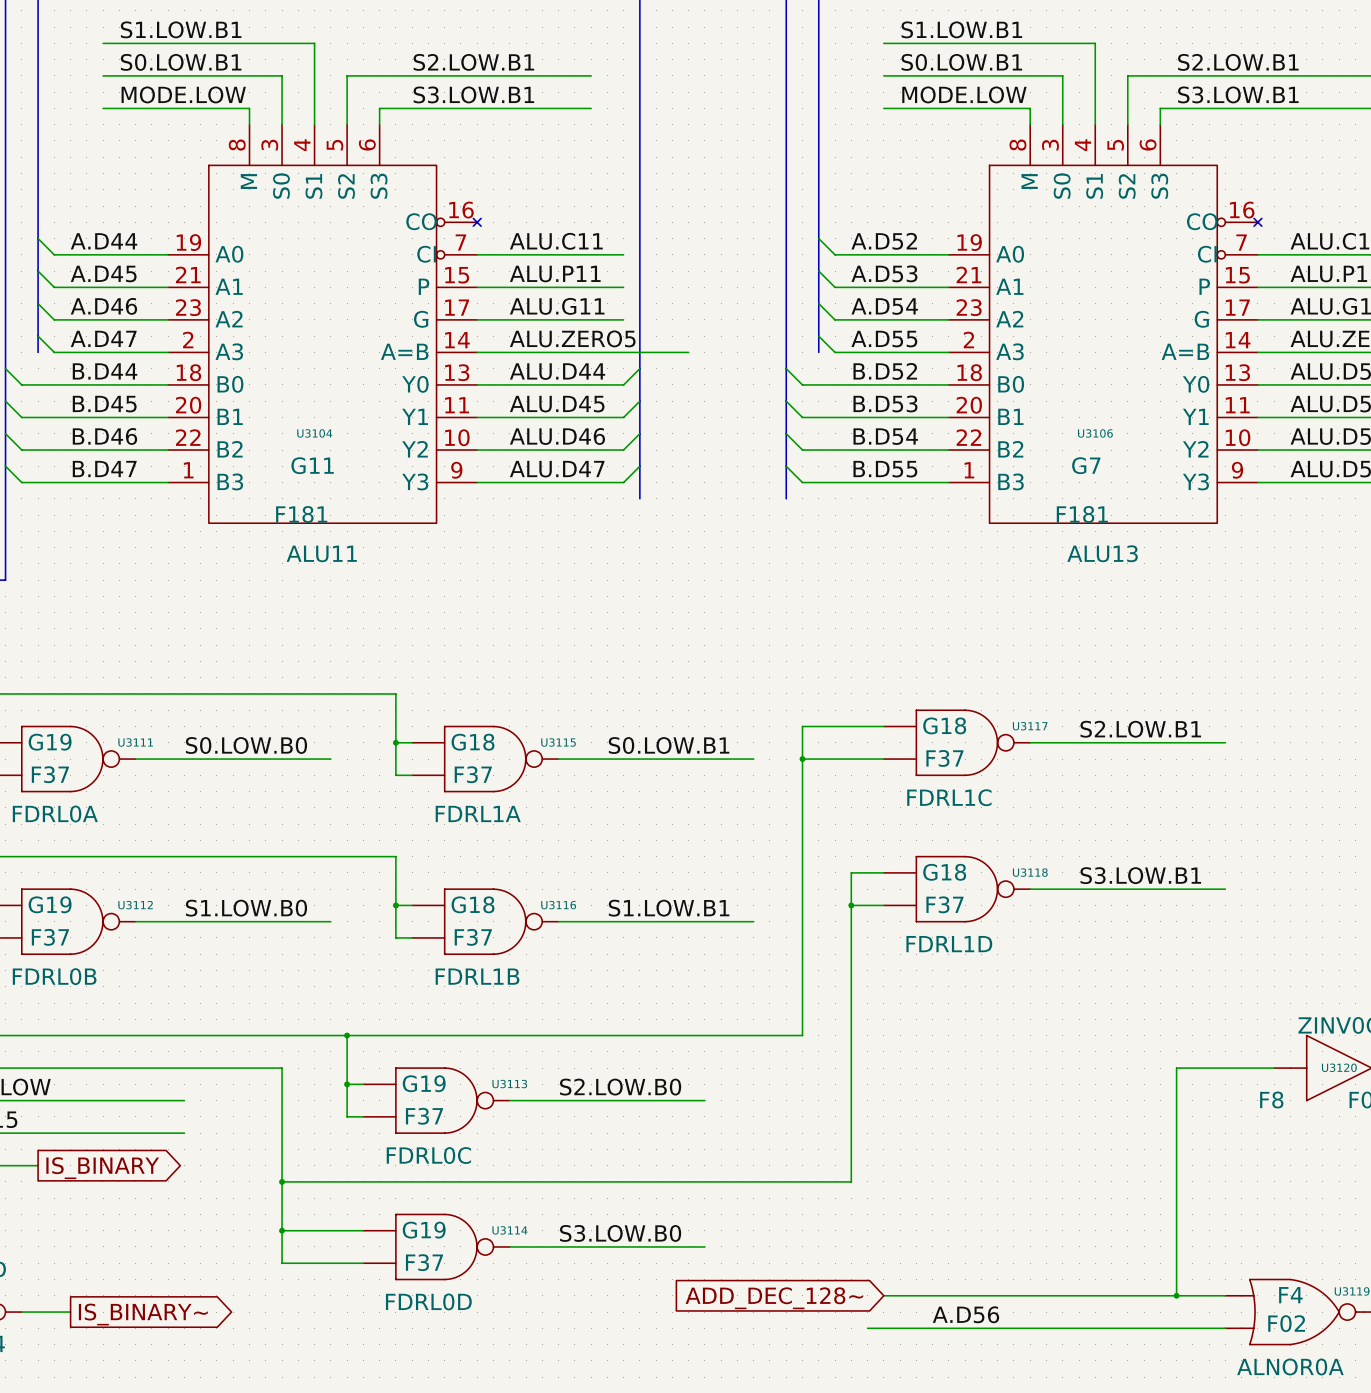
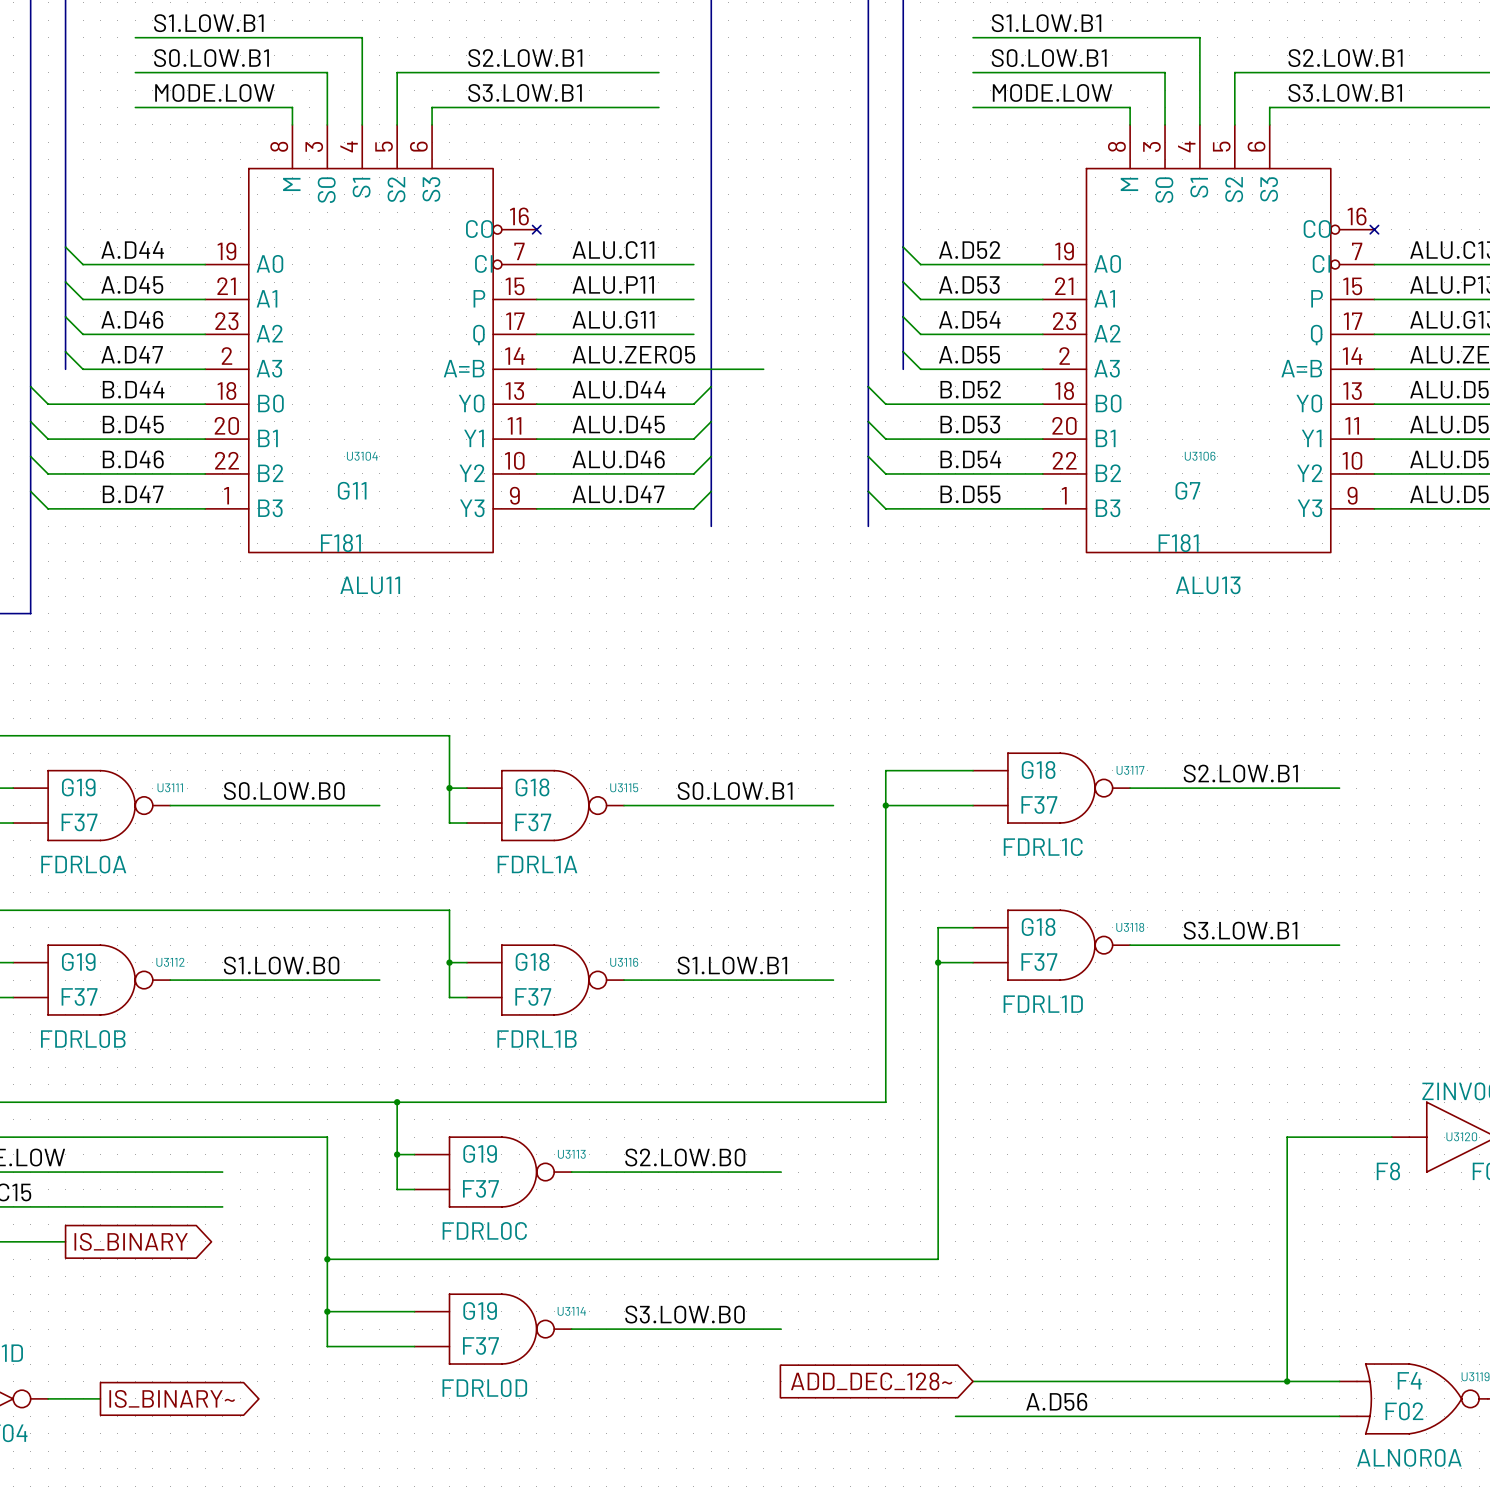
U3104 pin name: G (421, 319) -> Q (478, 335)
U3106 pin name: G (1201, 319) -> Q (1316, 335)

